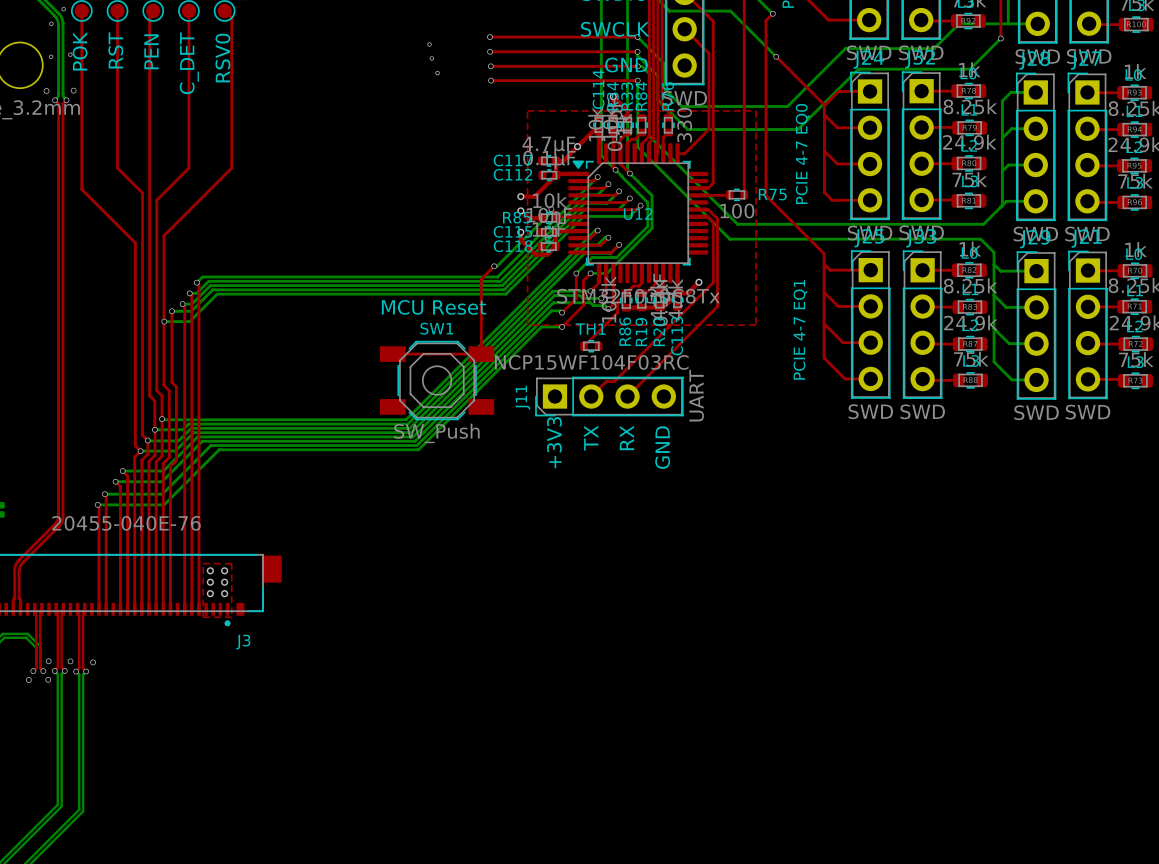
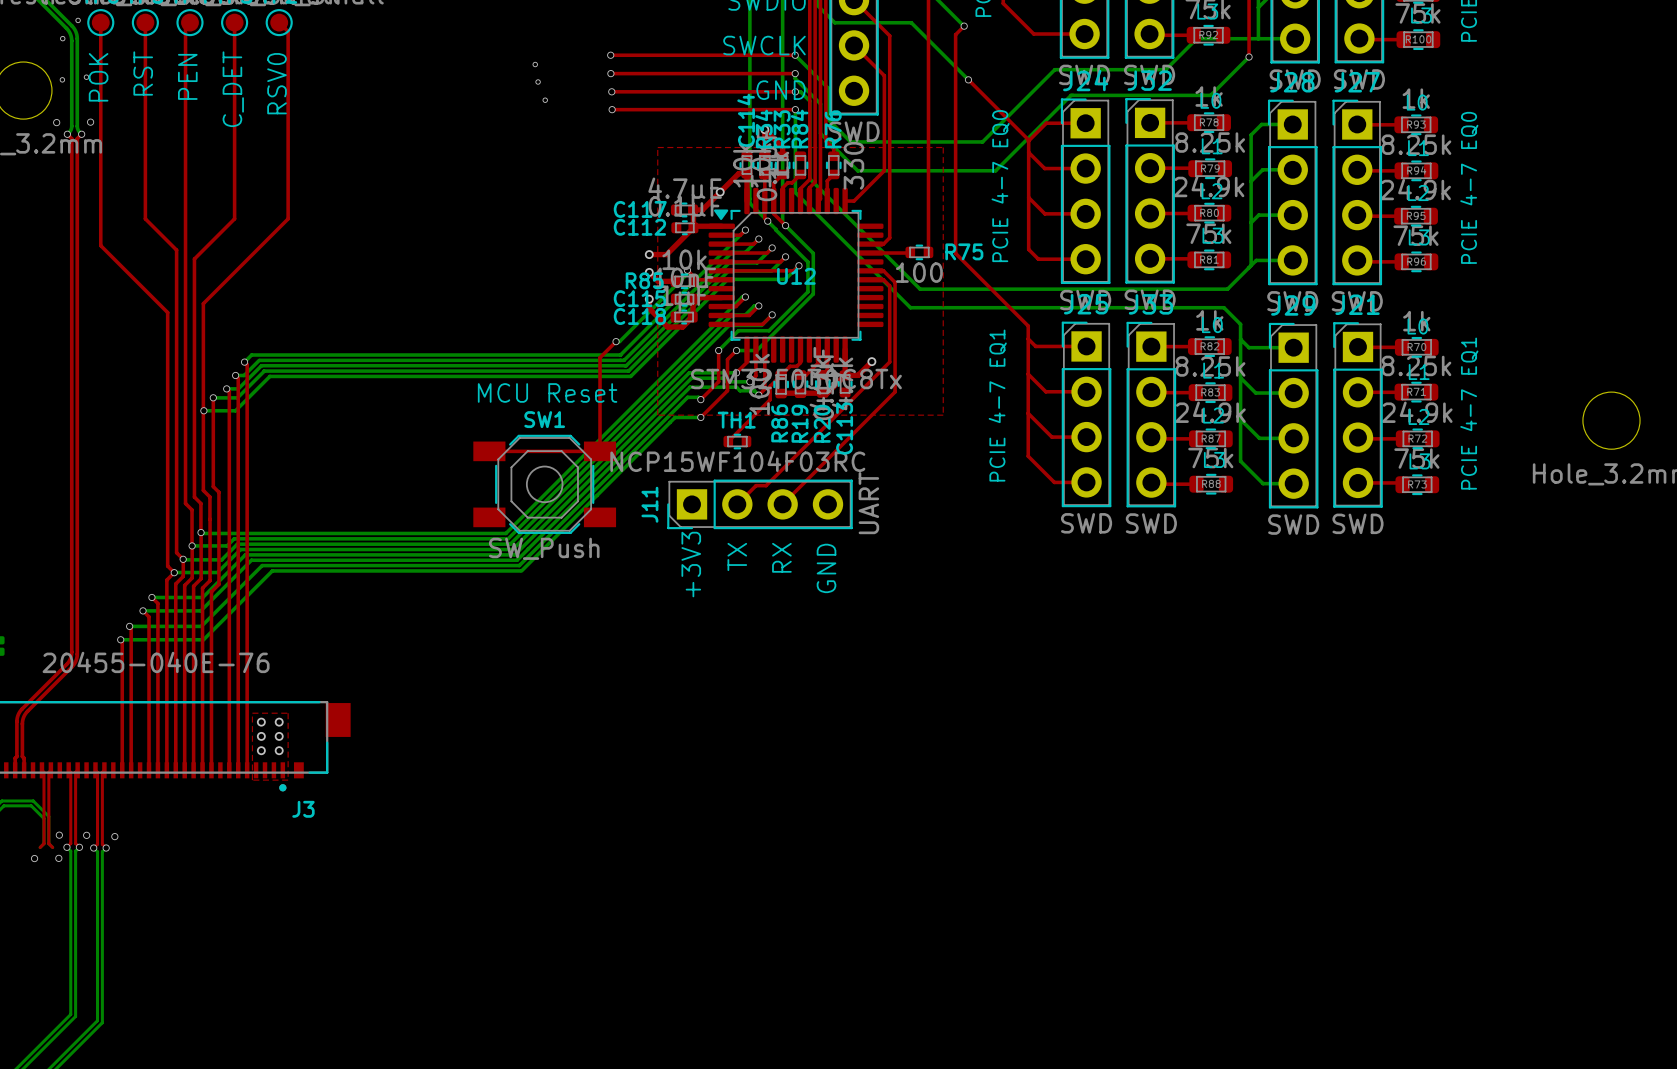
via: (33, 671) -> none
via: (43, 671) -> none

